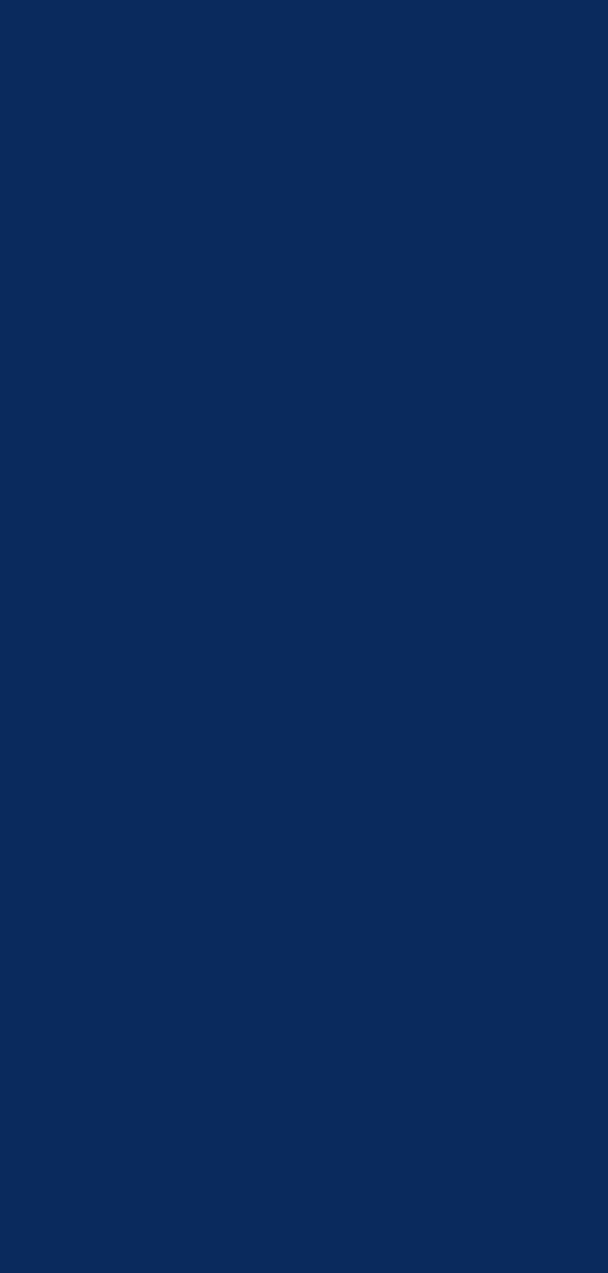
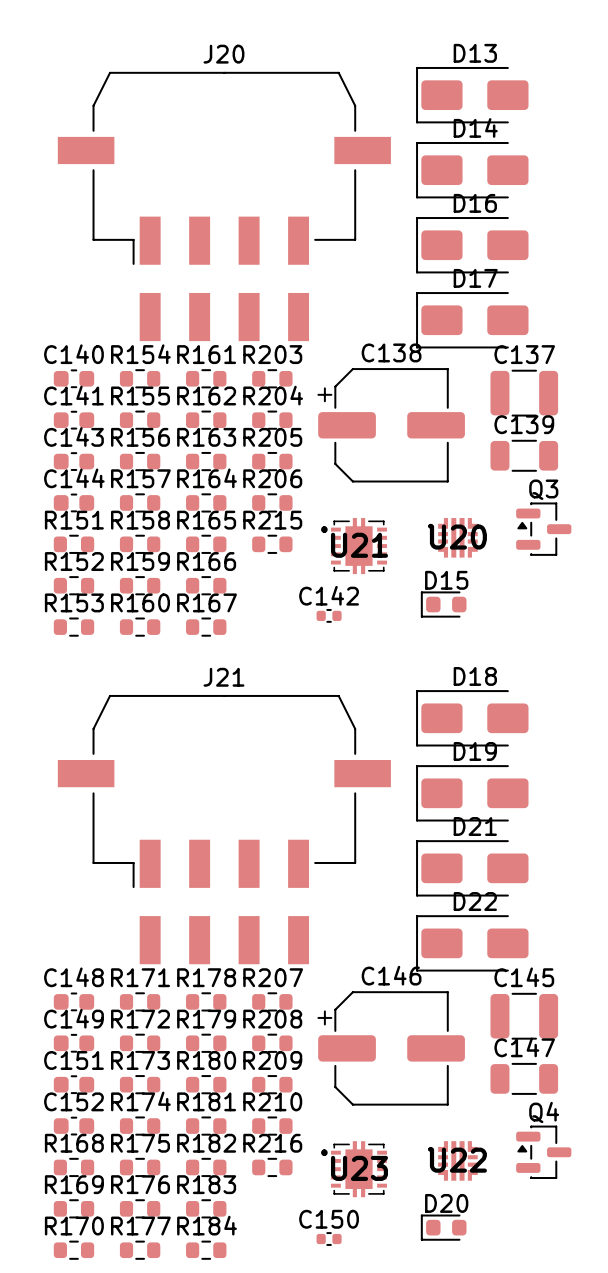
D13: none -> (472, 95)
D14: none -> (472, 170)
J20: none -> (224, 206)
D16: none -> (472, 245)
D17: none -> (472, 320)
C140: none -> (73, 378)
R154: none -> (140, 378)
R161: none -> (206, 378)
R203: none -> (272, 378)
C137: none -> (524, 393)
C141: none -> (73, 420)
R155: none -> (140, 420)
R162: none -> (206, 420)
R204: none -> (272, 420)
C138: none -> (391, 425)
C139: none -> (524, 455)
C143: none -> (73, 461)
R156: none -> (140, 461)
R163: none -> (206, 461)
R205: none -> (272, 461)
C144: none -> (73, 502)
R157: none -> (140, 502)
R164: none -> (206, 502)
R206: none -> (272, 502)
Q3: none -> (543, 529)
U20: none -> (452, 537)
R151: none -> (73, 544)
R158: none -> (140, 544)
R165: none -> (206, 544)
R215: none -> (272, 544)
U21: none -> (354, 546)
R152: none -> (73, 585)
R159: none -> (140, 585)
R166: none -> (206, 585)
D15: none -> (443, 604)
C142: none -> (329, 615)
R153: none -> (73, 627)
R160: none -> (140, 627)
R167: none -> (206, 627)
D18: none -> (472, 718)
D19: none -> (472, 793)
J21: none -> (224, 829)
D21: none -> (472, 868)
D22: none -> (472, 943)
C148: none -> (73, 1001)
R171: none -> (140, 1001)
R178: none -> (206, 1001)
R207: none -> (272, 1001)
C145: none -> (524, 1016)
C149: none -> (73, 1043)
R172: none -> (140, 1043)
R179: none -> (206, 1043)
R208: none -> (272, 1043)
C146: none -> (391, 1048)
C147: none -> (524, 1078)
C151: none -> (73, 1084)
R173: none -> (140, 1084)
R180: none -> (206, 1084)
R209: none -> (272, 1084)
C152: none -> (73, 1126)
R174: none -> (140, 1126)
R181: none -> (206, 1126)
R210: none -> (272, 1126)
Q4: none -> (543, 1152)
U22: none -> (452, 1160)
R168: none -> (73, 1167)
R175: none -> (140, 1167)
R182: none -> (206, 1167)
R216: none -> (272, 1167)
U23: none -> (354, 1169)
R169: none -> (73, 1208)
R176: none -> (140, 1208)
R183: none -> (206, 1208)
D20: none -> (443, 1227)
C150: none -> (329, 1239)
R170: none -> (73, 1250)
R177: none -> (140, 1250)
R184: none -> (206, 1250)

